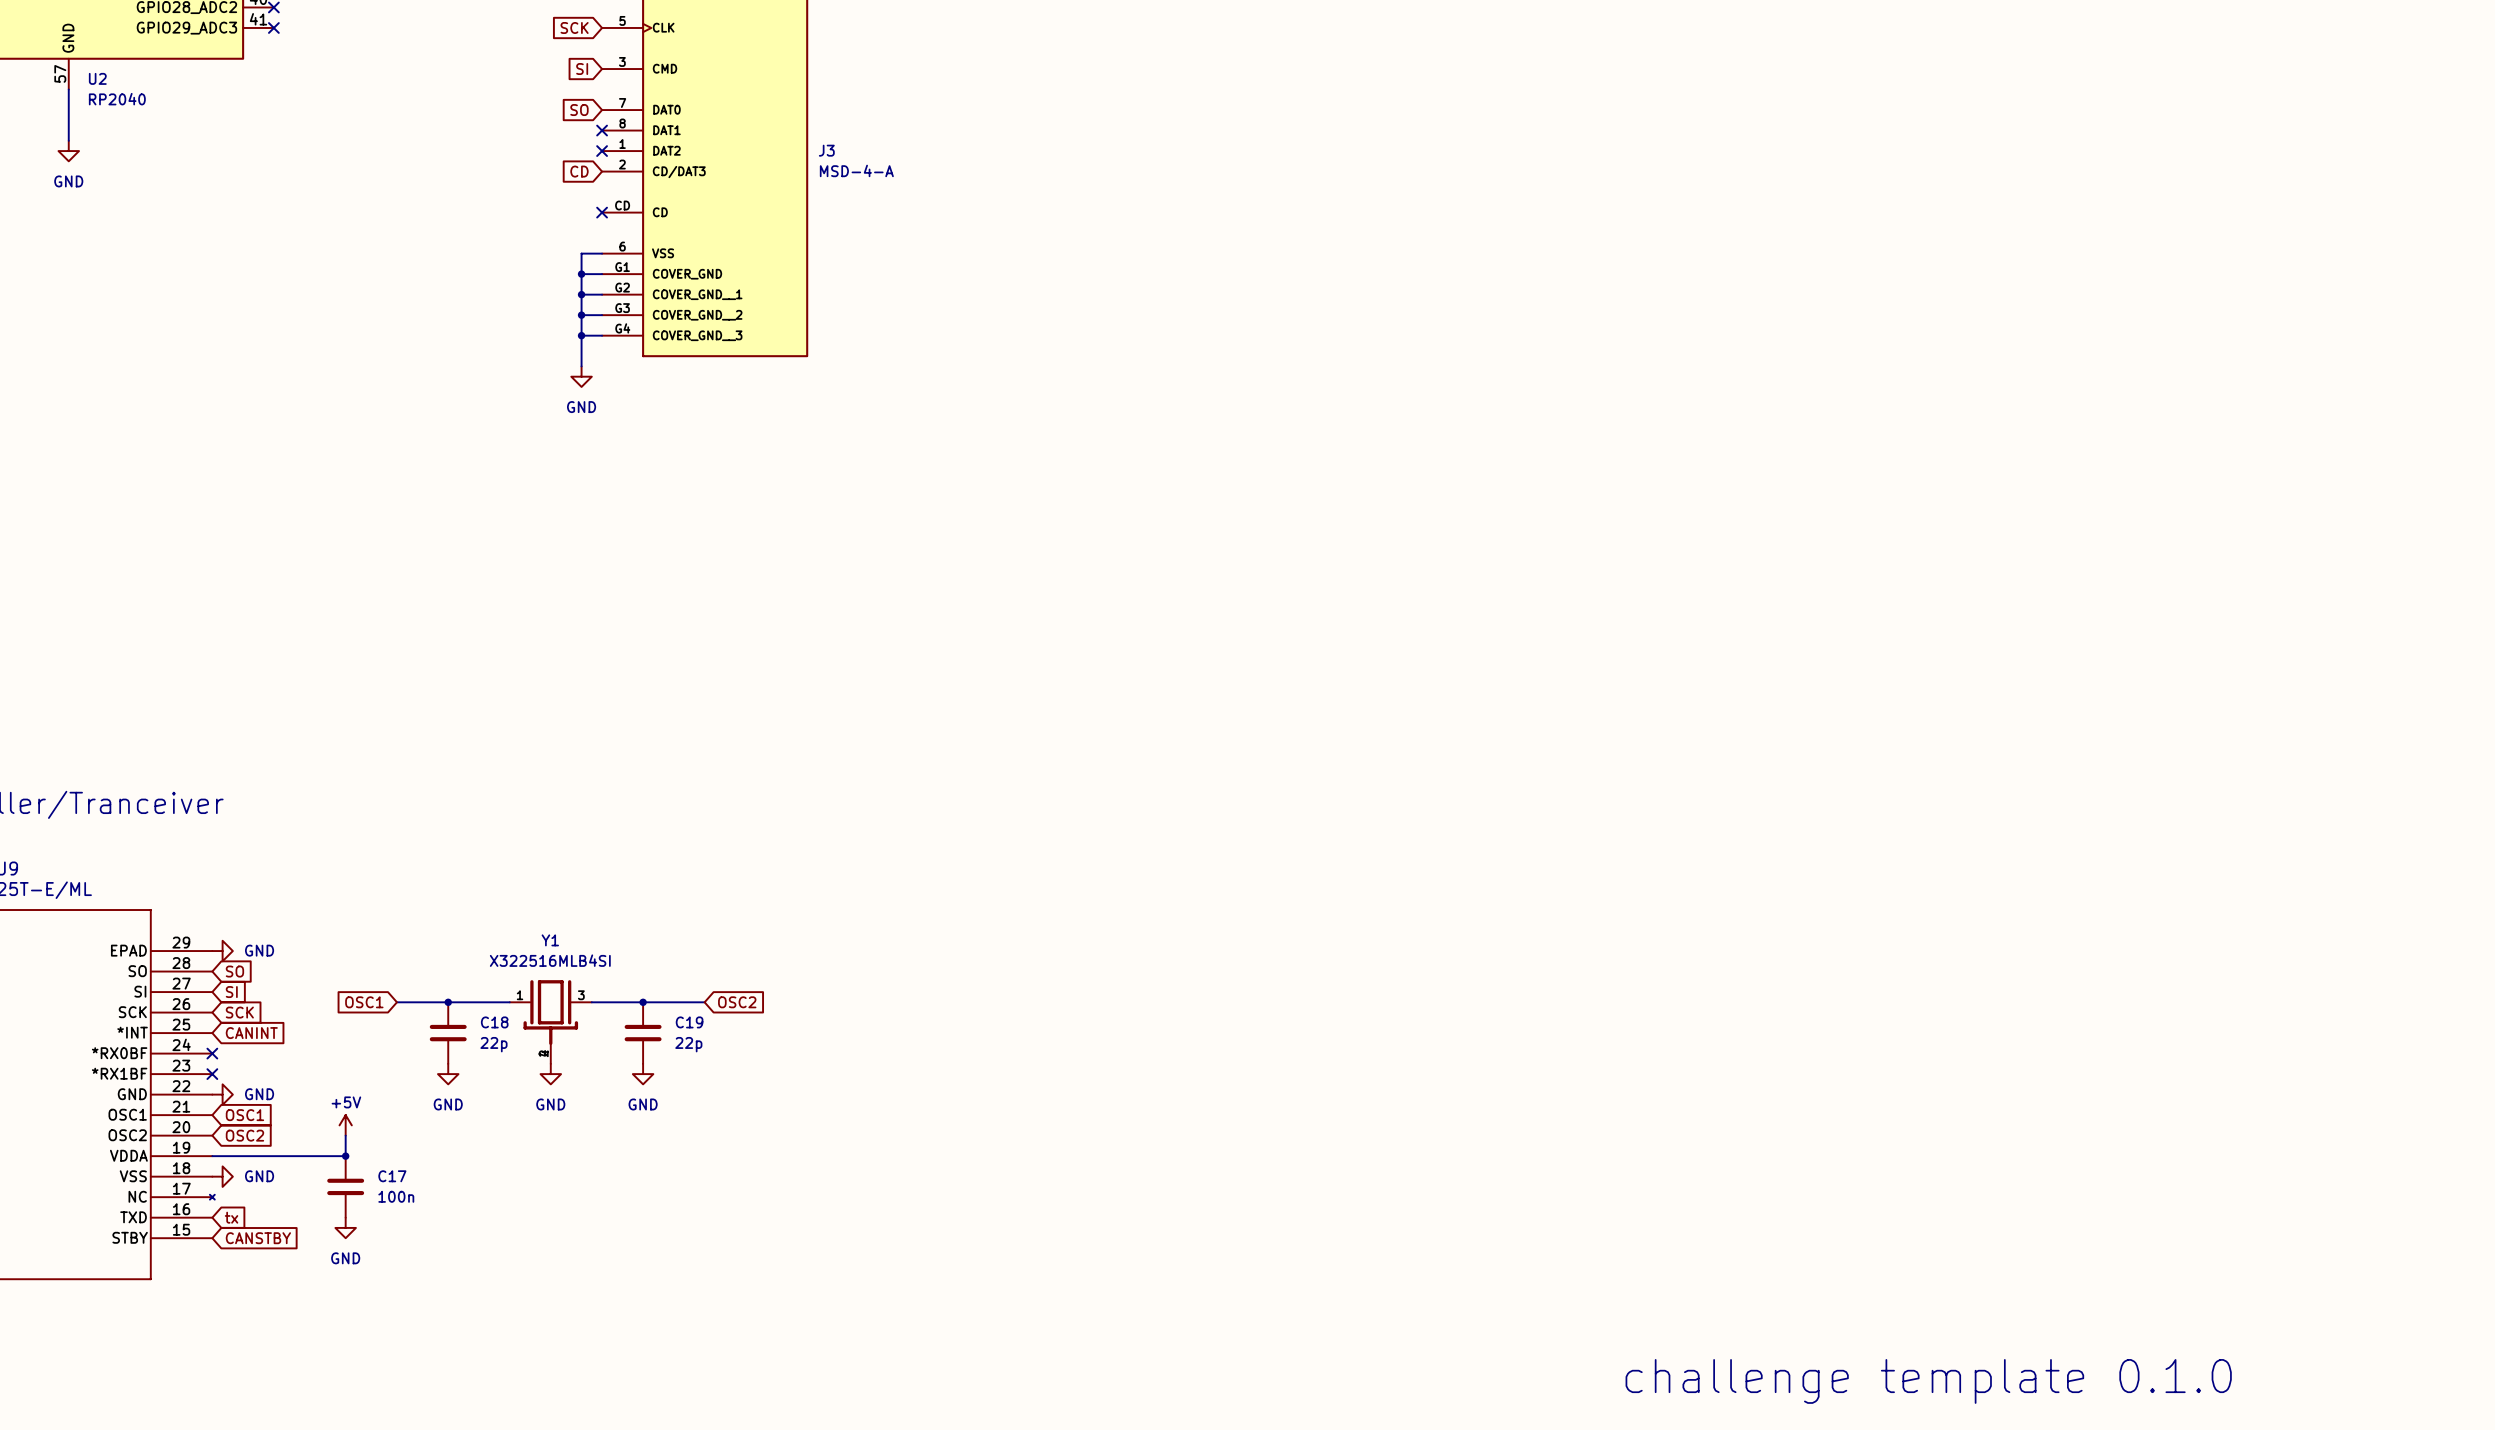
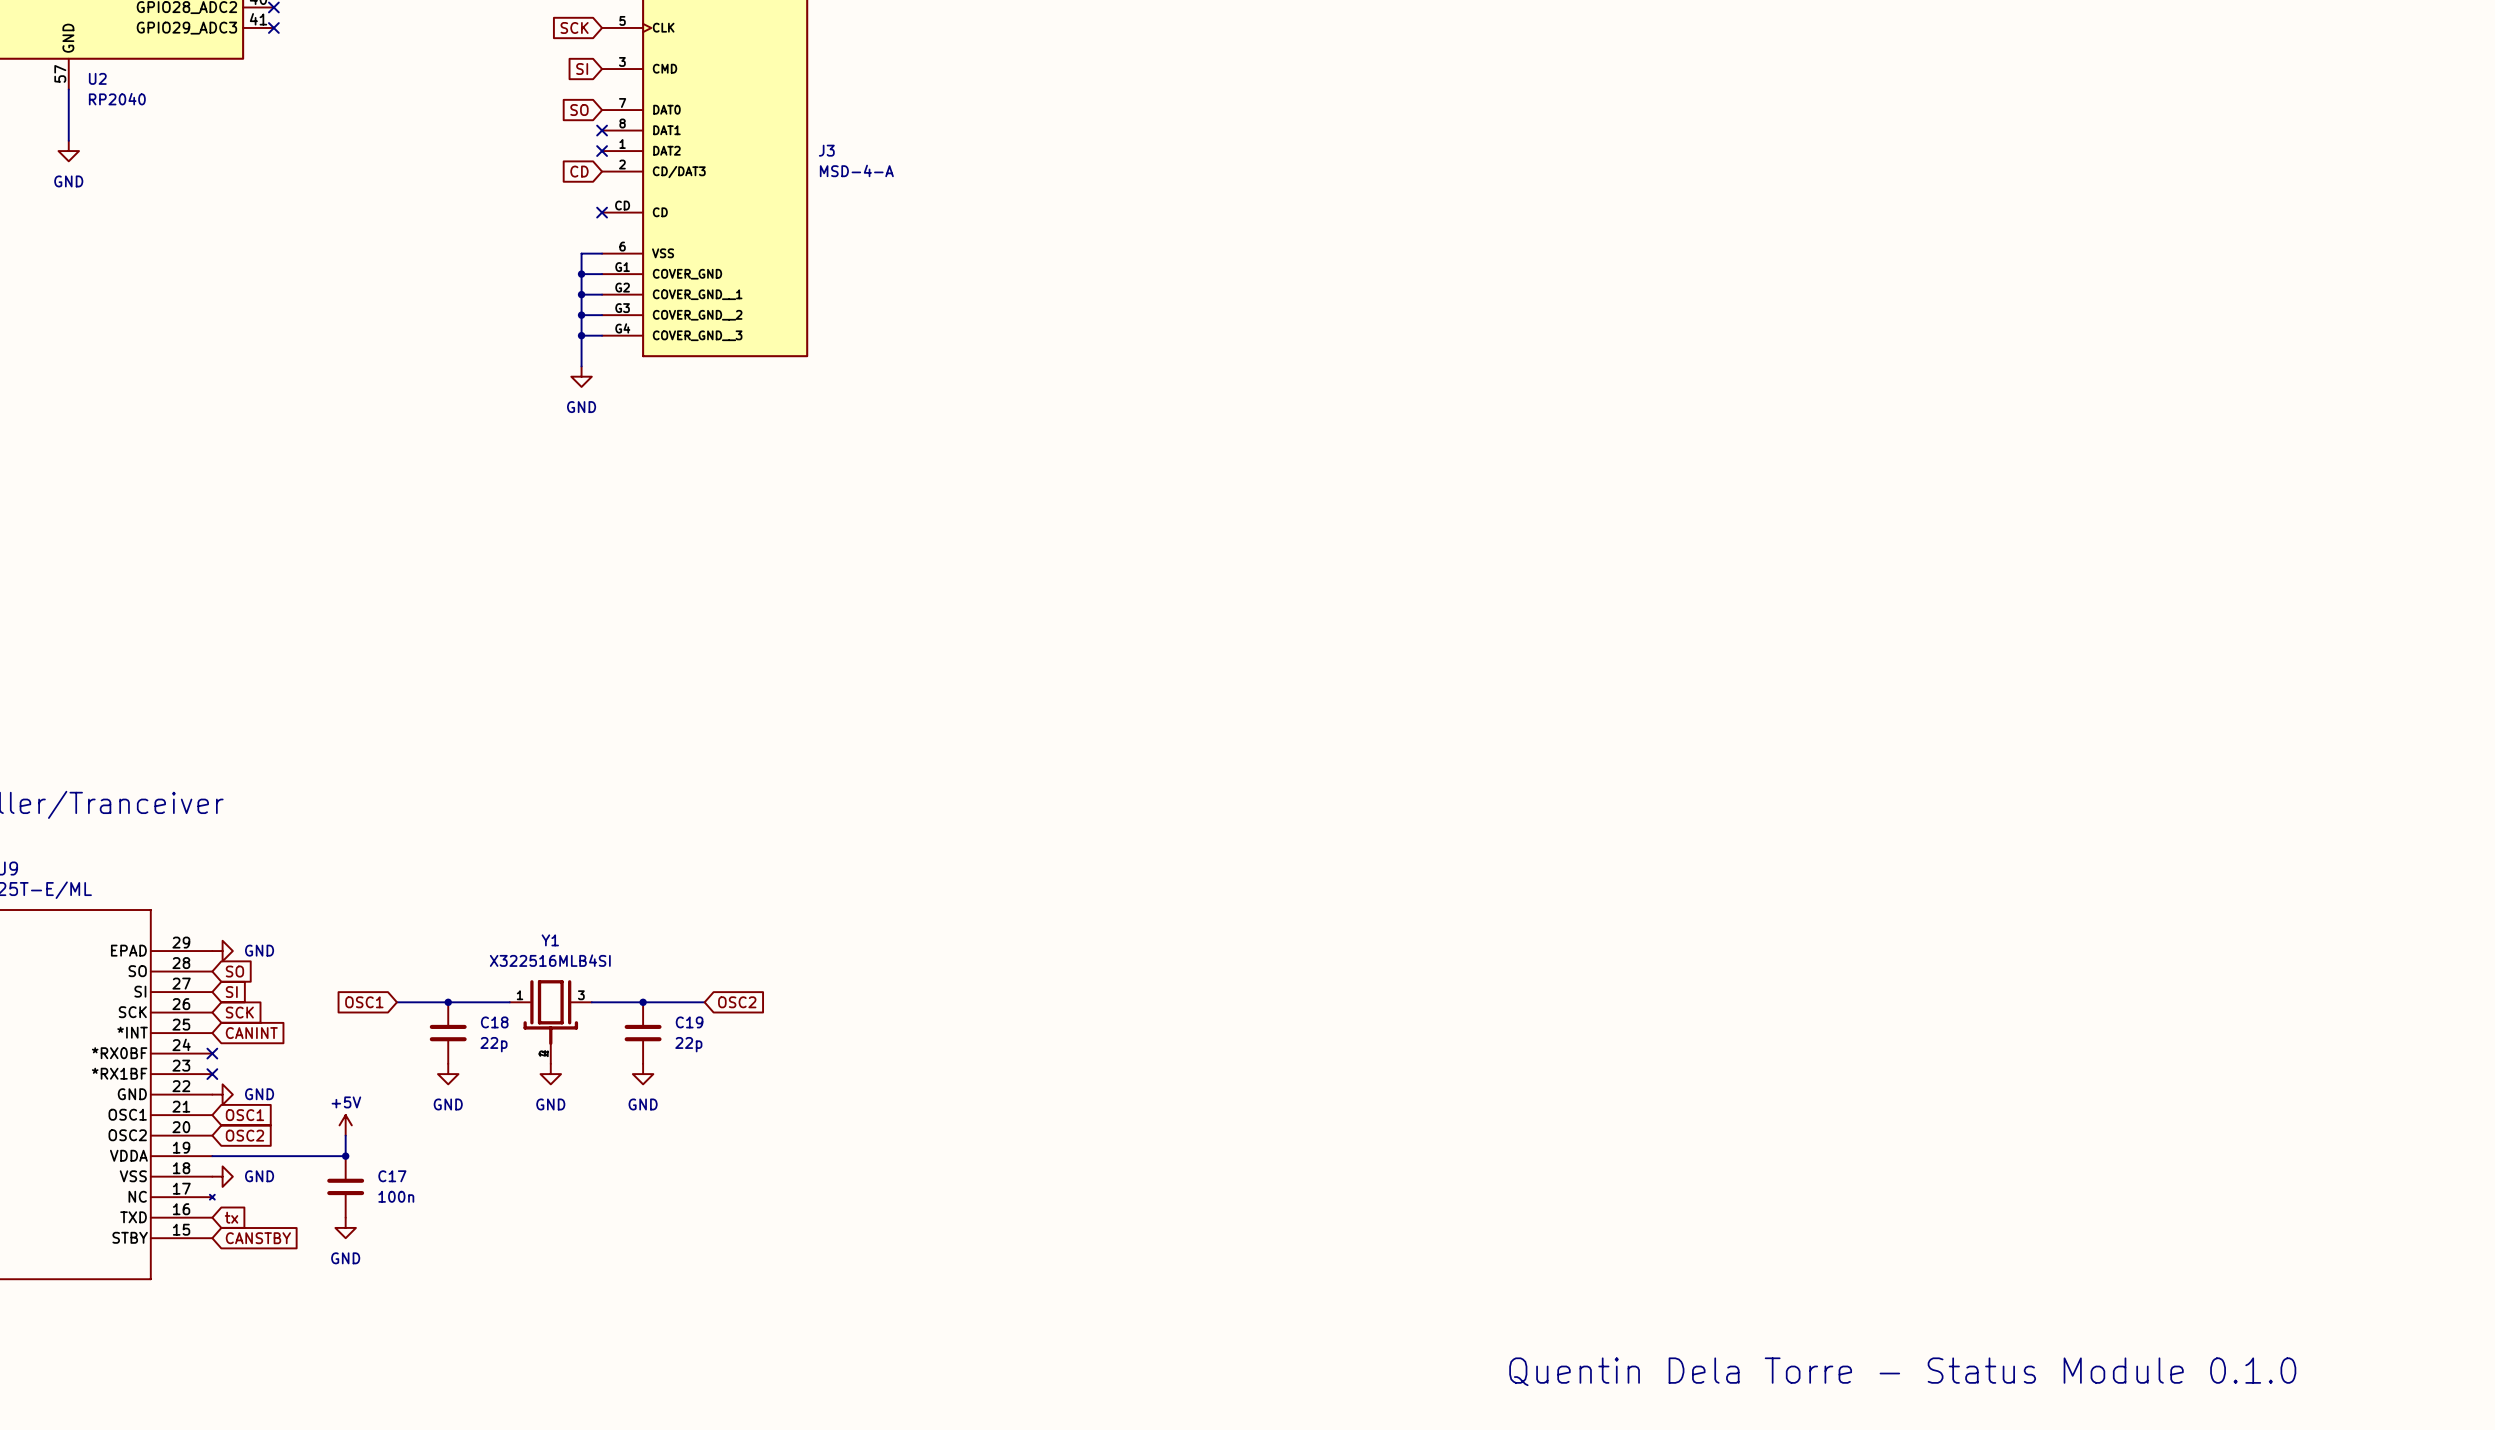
text: none -> Quentin Dela Torre - Status Module 0.1.0 (1902, 1371)
text: challenge template 0.1.0 (1928, 1381) -> none

